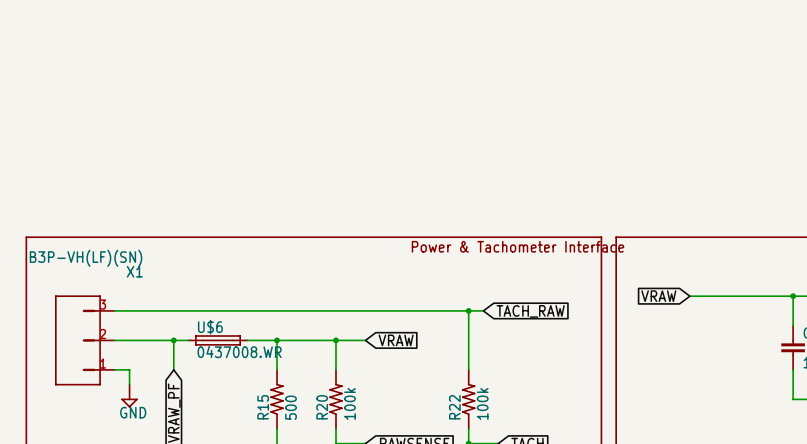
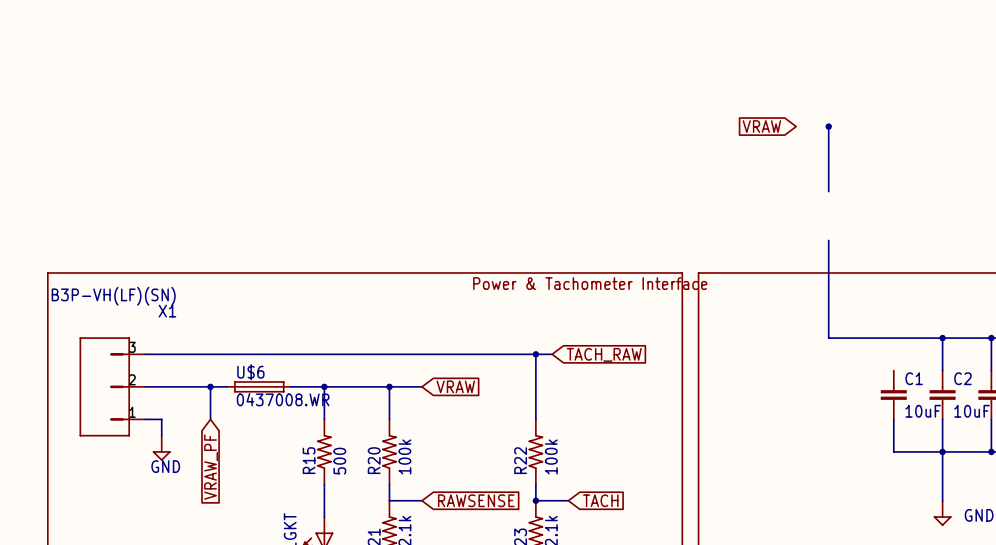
global label: none -> VRAW (761, 126)
wire: none -> (828, 126) (828, 191)
junction: none -> (828, 126)
global label: VRAW (658, 296) -> none
wire: (689, 296) (734, 296) -> (828, 240) (828, 338)
wire: (793, 296) (793, 325) -> none
junction: (793, 296) -> none

